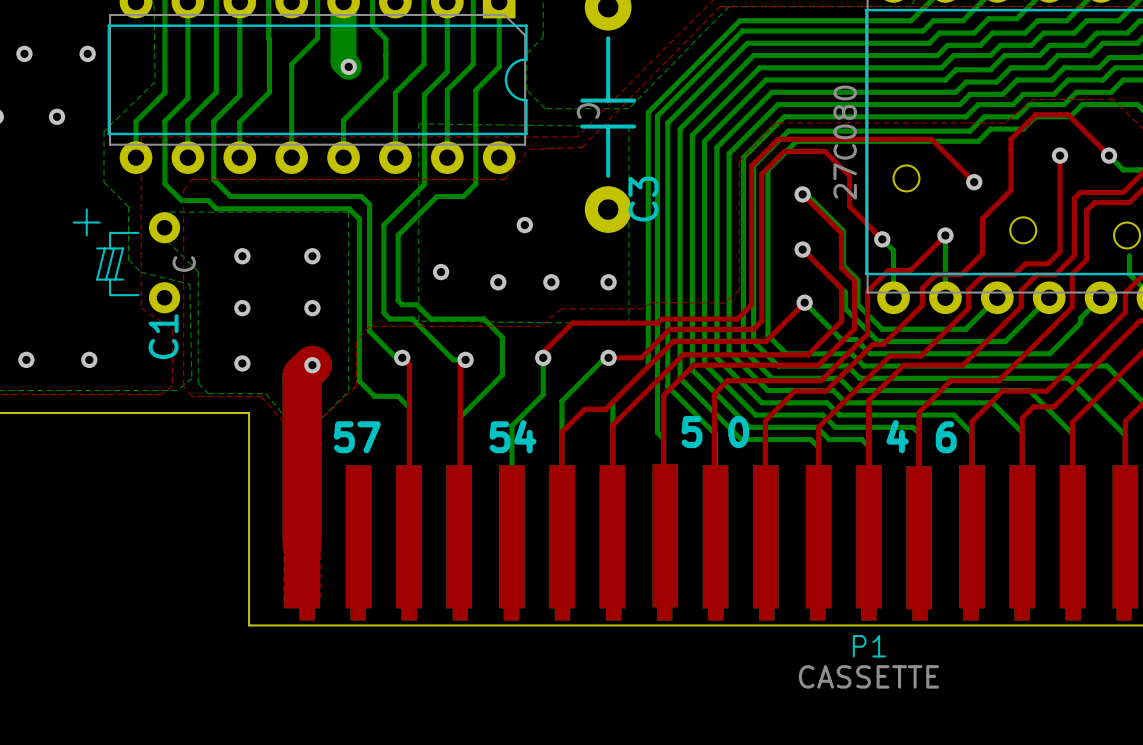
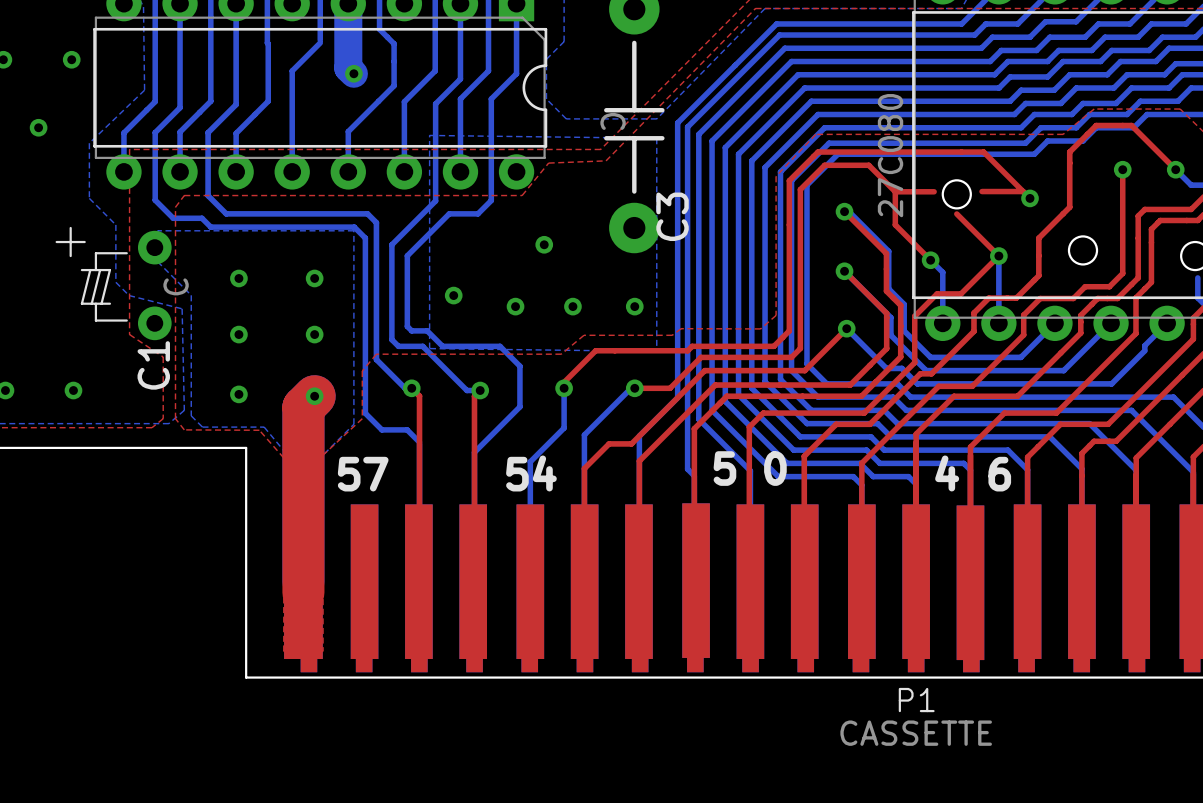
top track: none -> (982, 191) (1023, 191)
top track: none -> (895, 191) (934, 191)
top track: none -> (956, 213) (998, 256)

